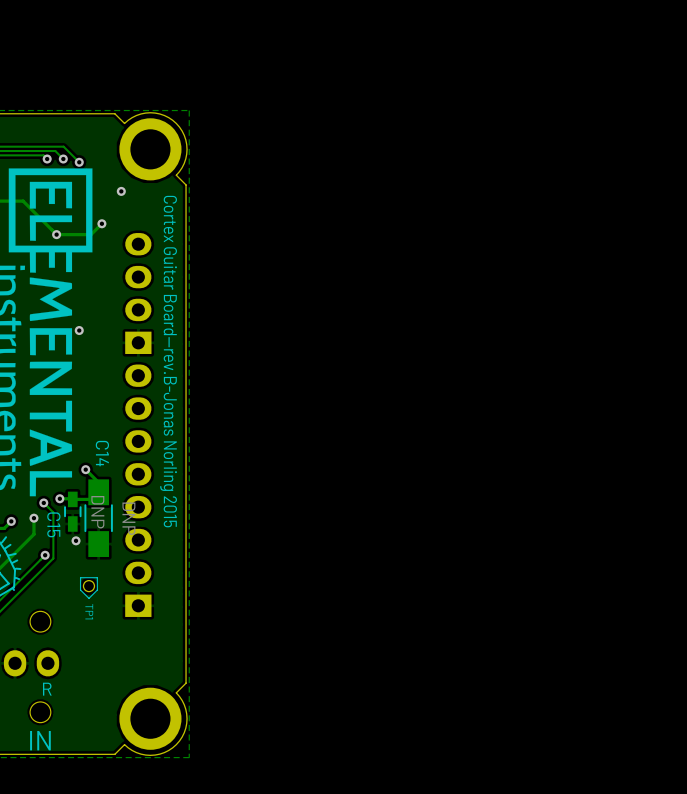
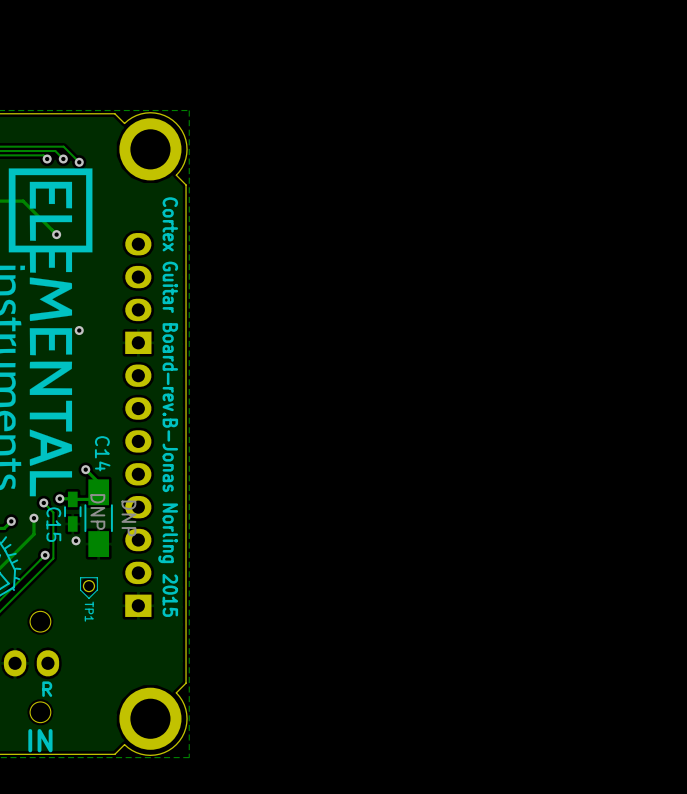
via: (121, 191) -> none
track: (101, 223) (91, 234) (56, 234) -> none
via: (101, 223) -> none

